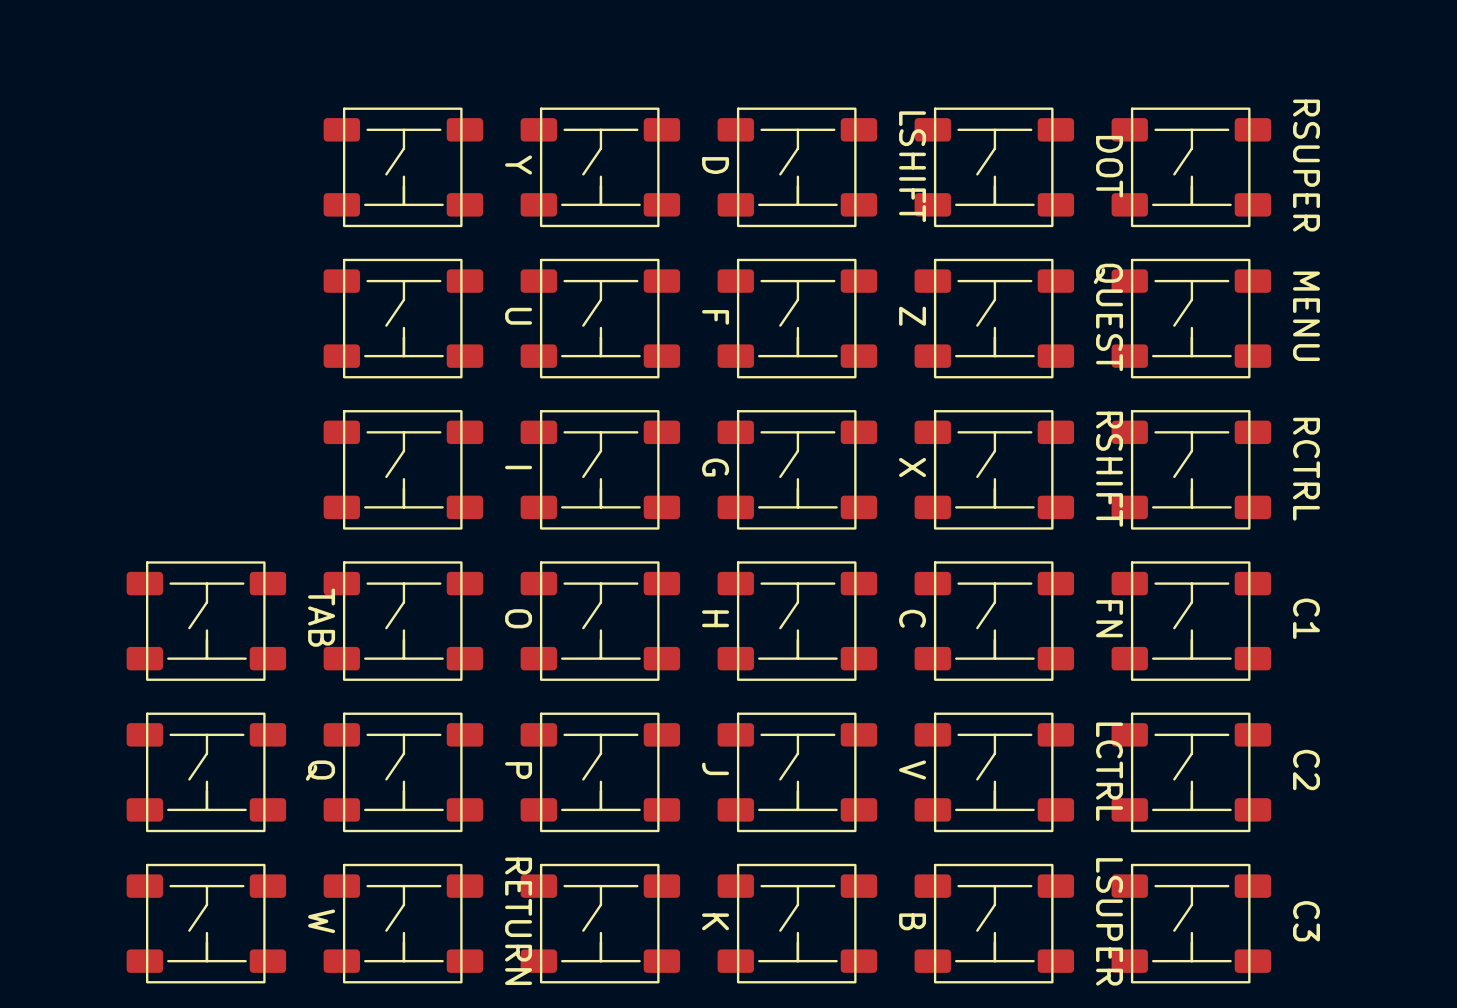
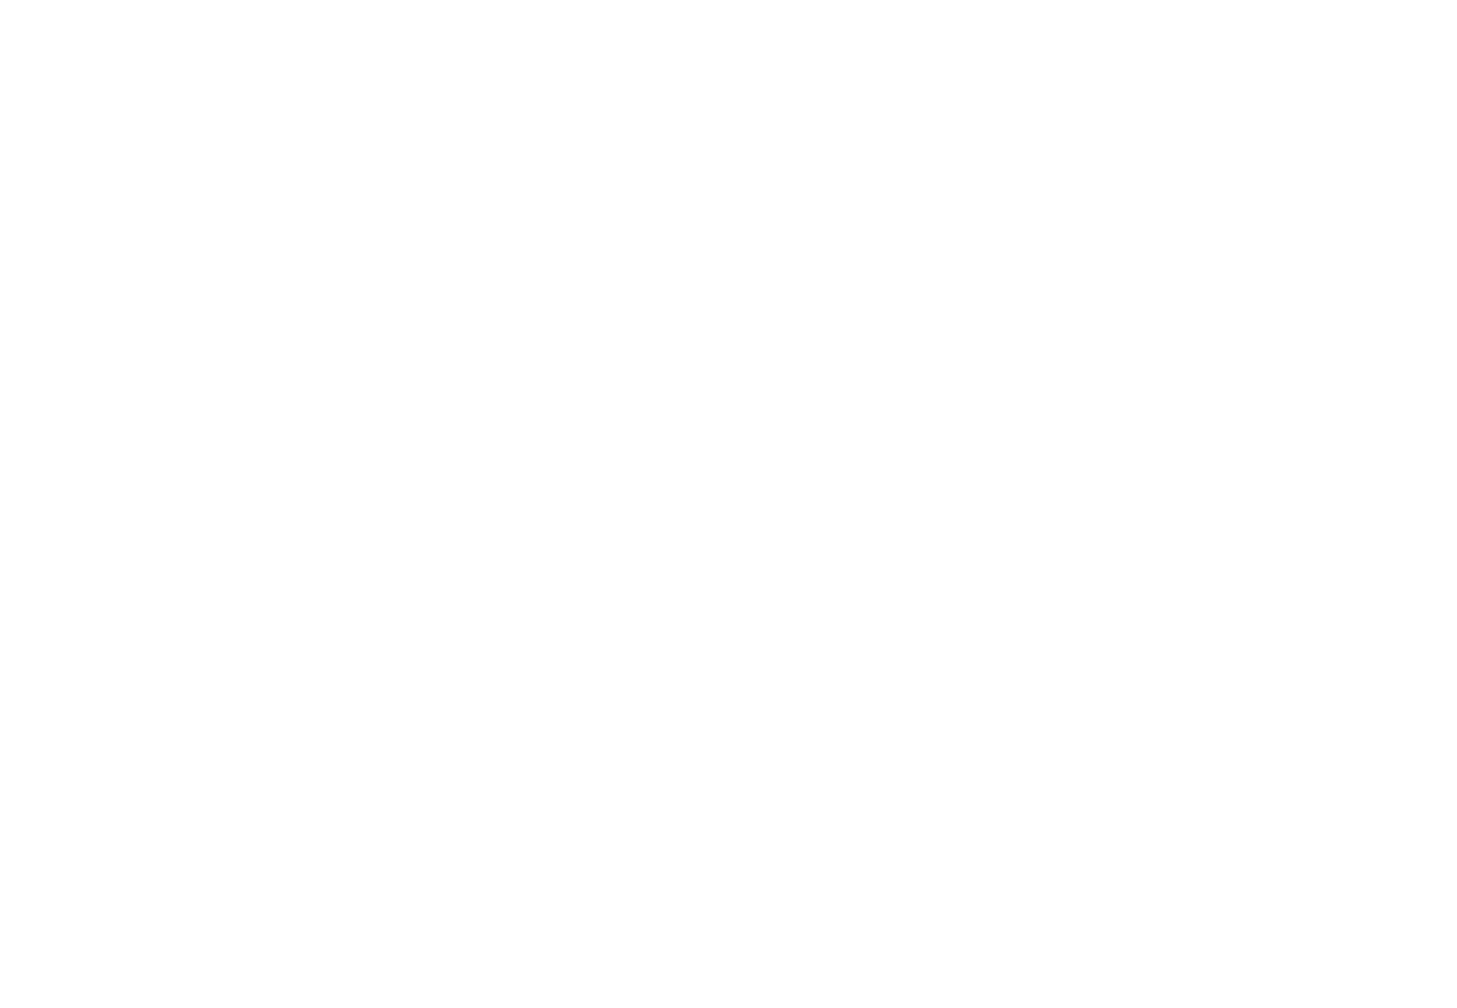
part: Y (403, 167) -> none
part: D (600, 167) -> none
part: LSHIFT (797, 167) -> none
part: DOT (994, 167) -> none
part: RSUPER (1191, 167) -> none
part: U (403, 318) -> none
part: F (600, 318) -> none
part: Z (797, 318) -> none
part: QUEST (994, 318) -> none
part: MENU (1191, 318) -> none
part: I (403, 469) -> none
part: G (600, 469) -> none
part: X (797, 469) -> none
part: RSHIFT (994, 469) -> none
part: RCTRL (1191, 469) -> none
part: TAB (206, 621) -> none
part: O (403, 621) -> none
part: H (600, 621) -> none
part: C (797, 621) -> none
part: FN (994, 621) -> none
part: C1 (1191, 621) -> none
part: Q (206, 772) -> none
part: P (403, 772) -> none
part: J (600, 772) -> none
part: V (797, 772) -> none
part: LCTRL (994, 772) -> none
part: C2 (1191, 772) -> none
part: W (206, 923) -> none
part: RETURN (403, 923) -> none
part: K (600, 923) -> none
part: B (797, 923) -> none
part: LSUPER (994, 923) -> none
part: C3 (1191, 923) -> none

